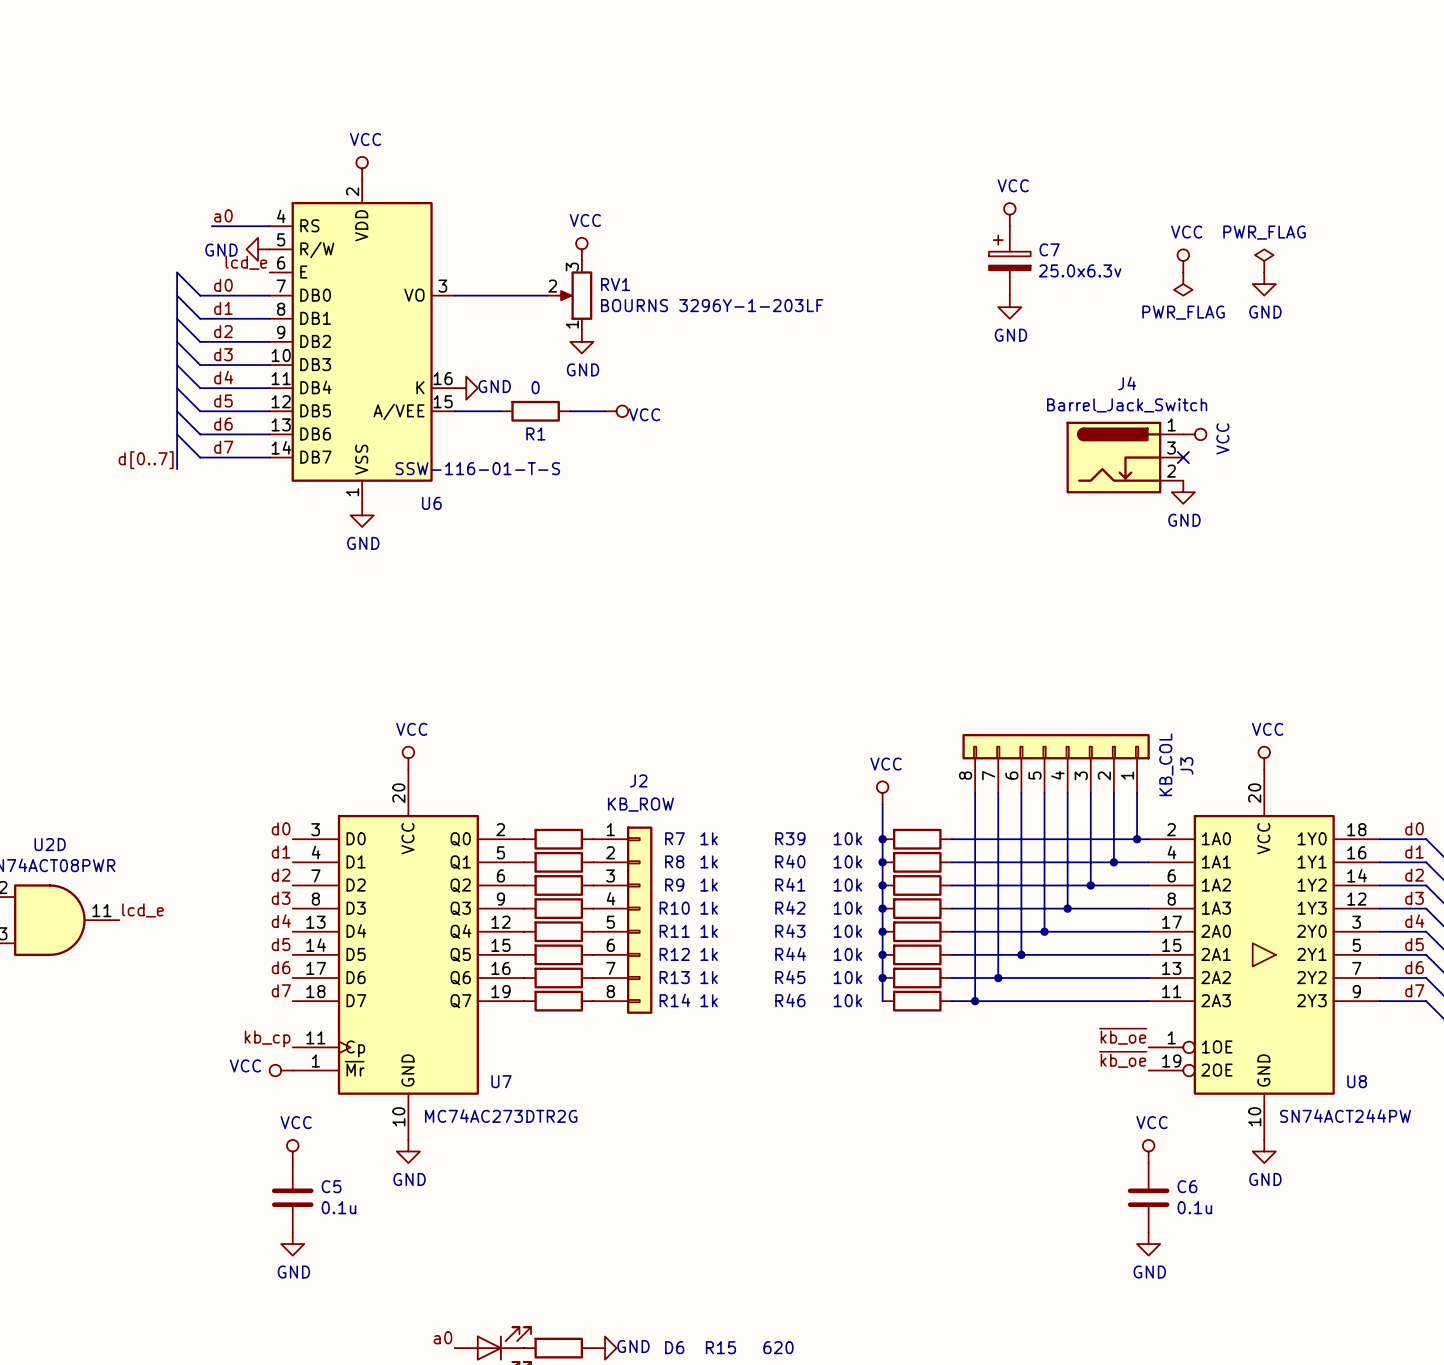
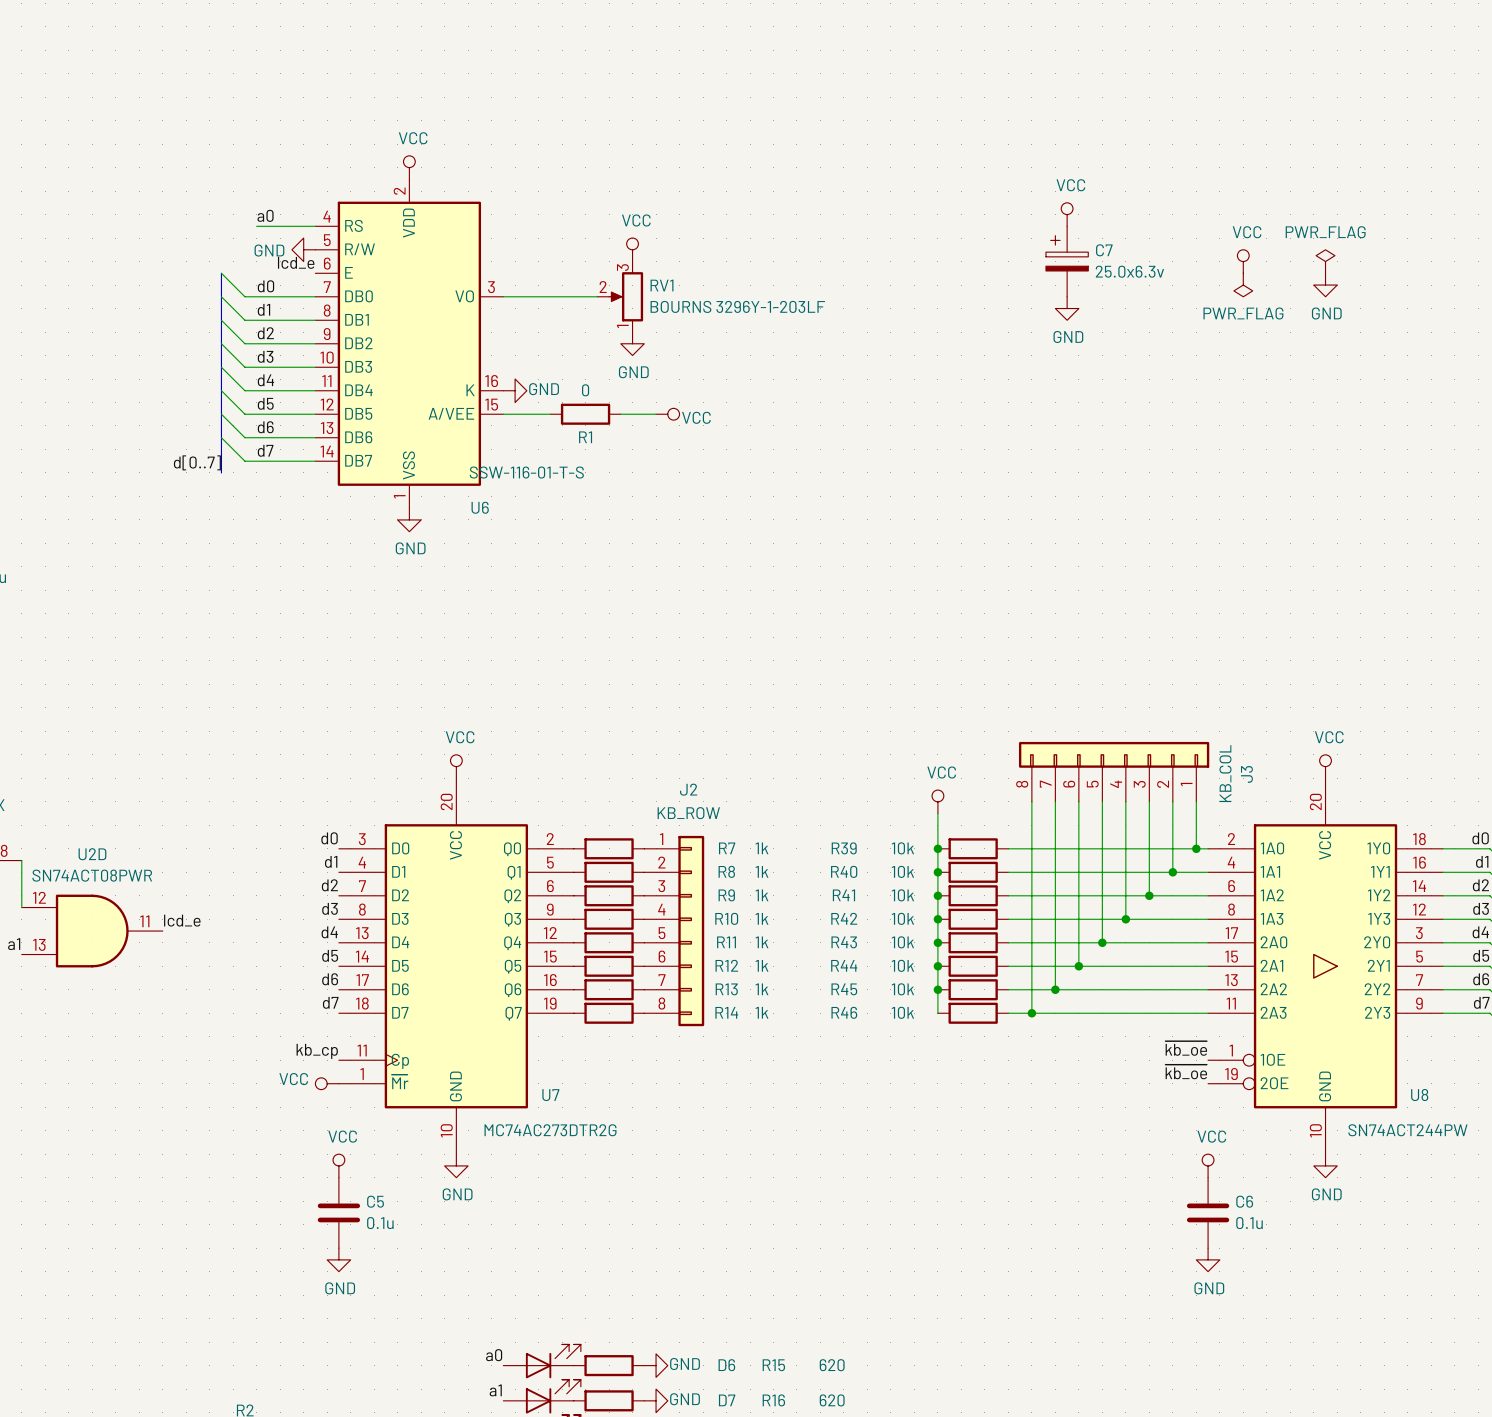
power symbol: VCC (1194, 434) -> none
J4: Barrel_Jack_Switch (1124, 457) -> none
no-connect mark: (1183, 457) -> none
power symbol: GND (1183, 492) -> none

